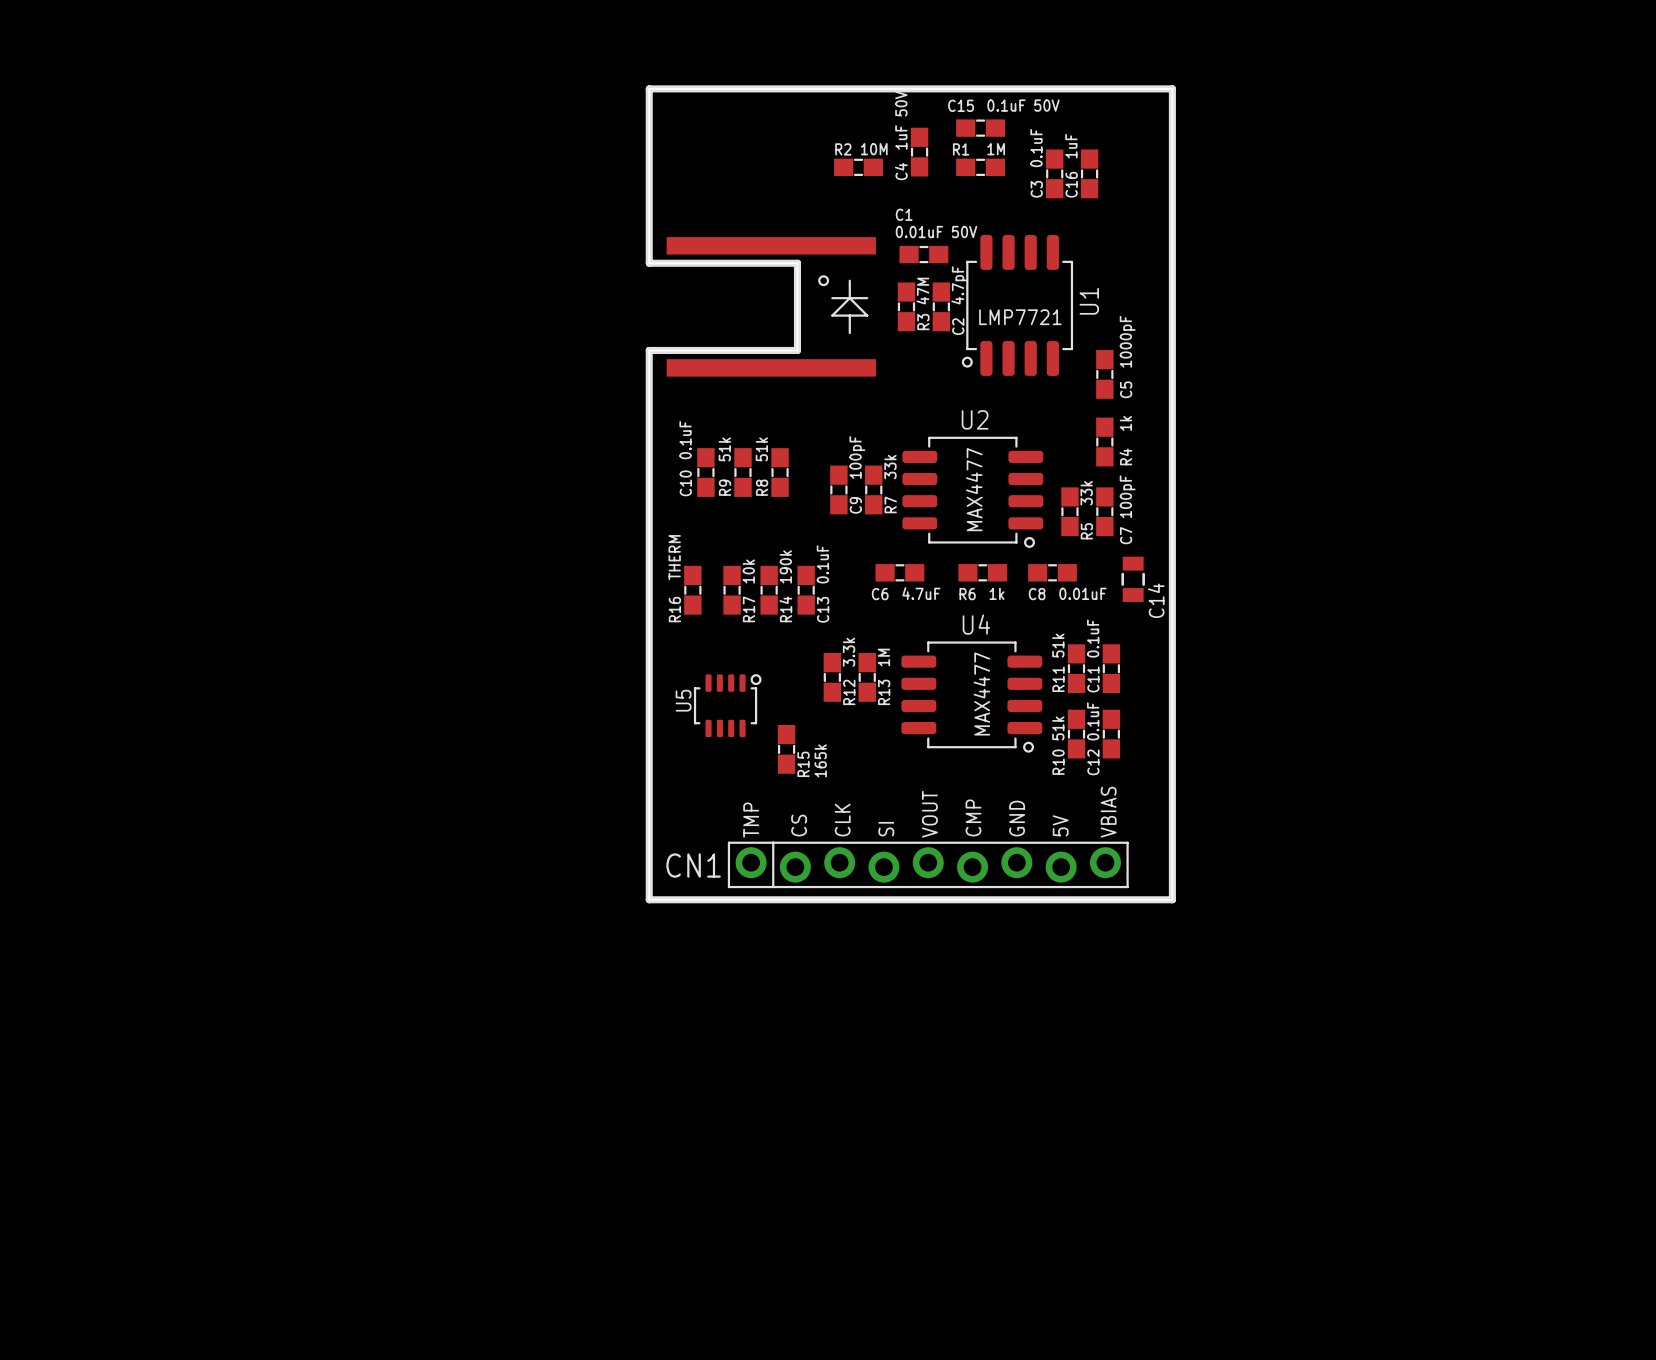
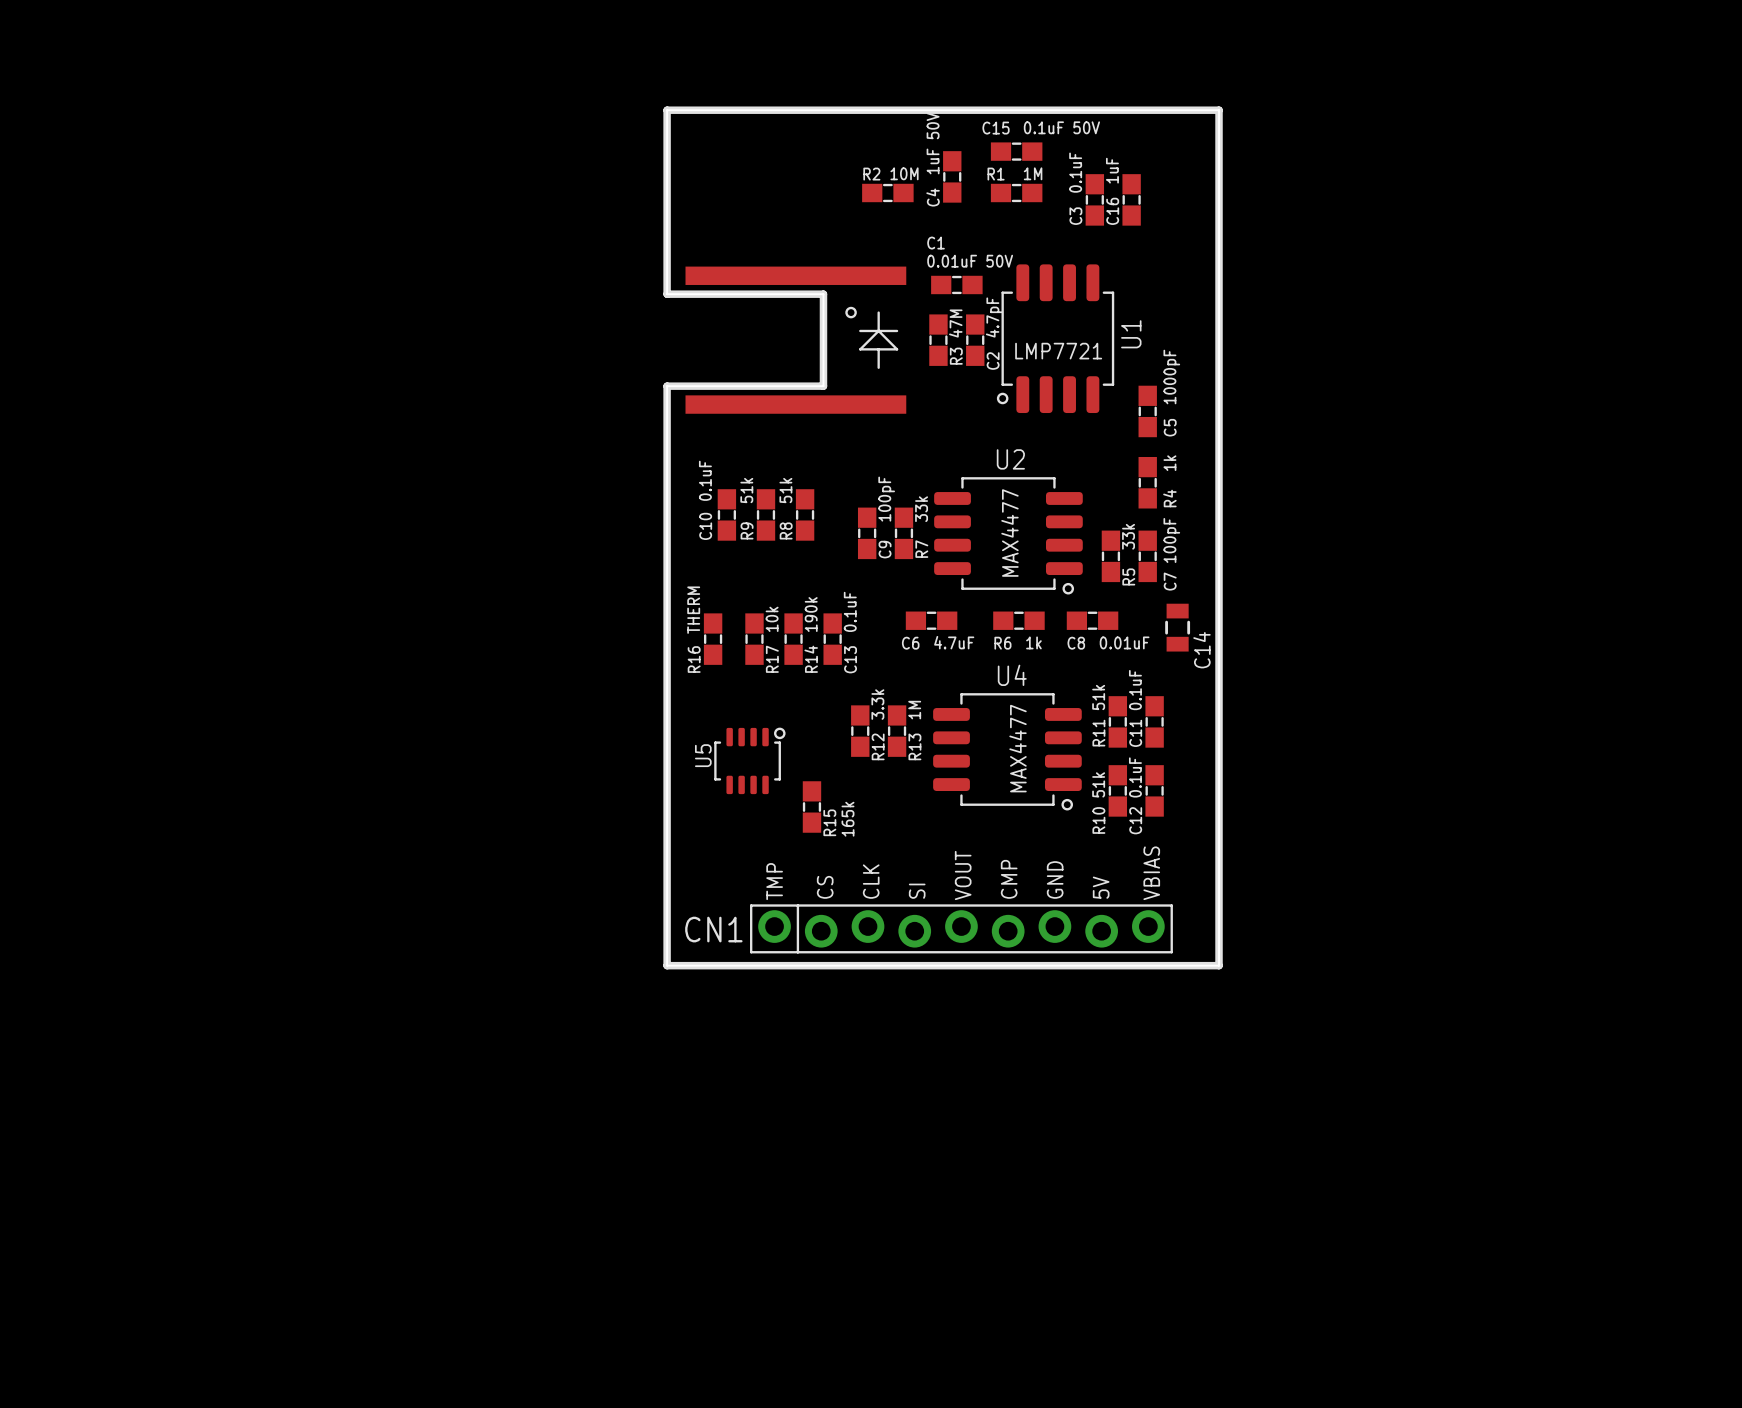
R16 value: THERM (674, 557) -> none
text: none -> THERM (693, 610)

